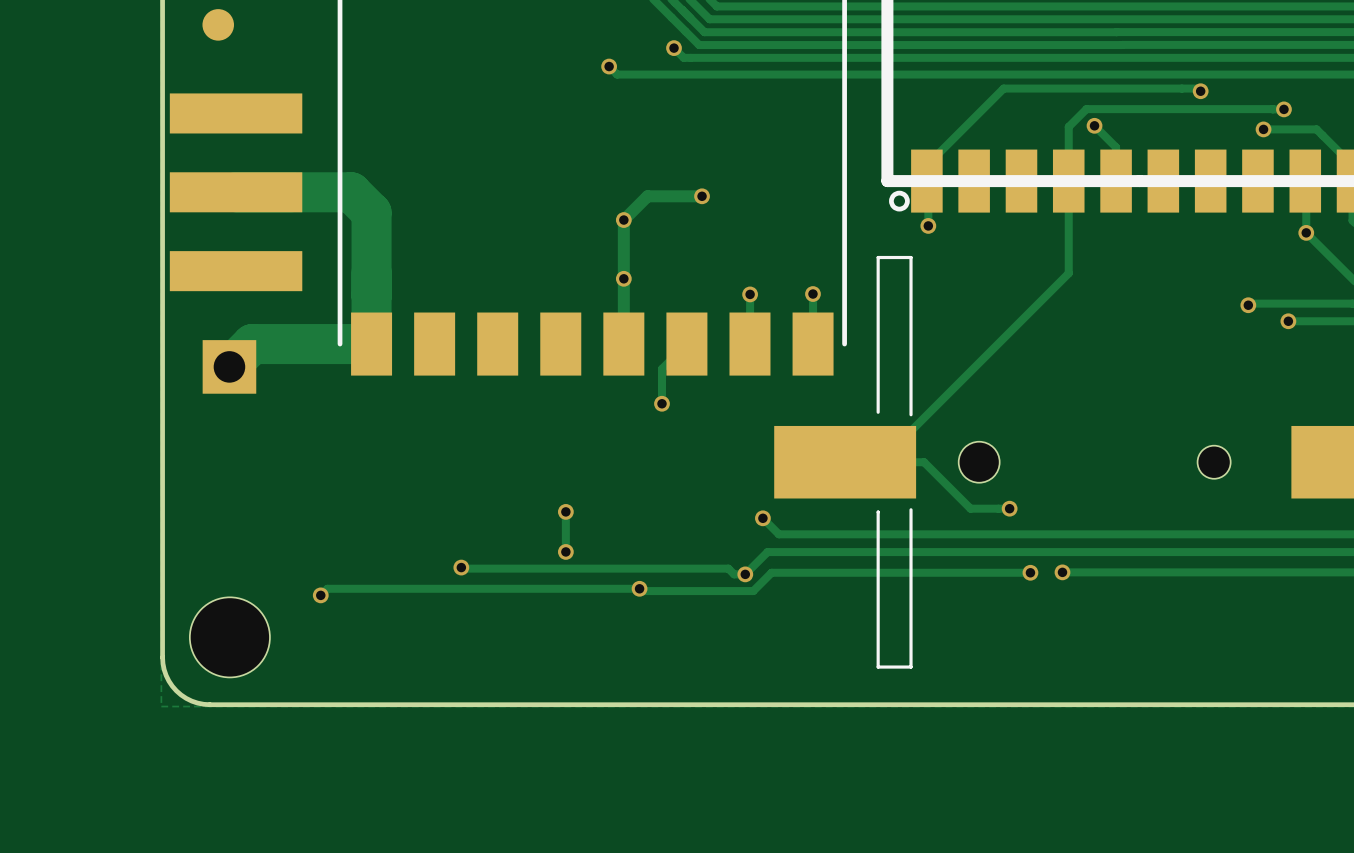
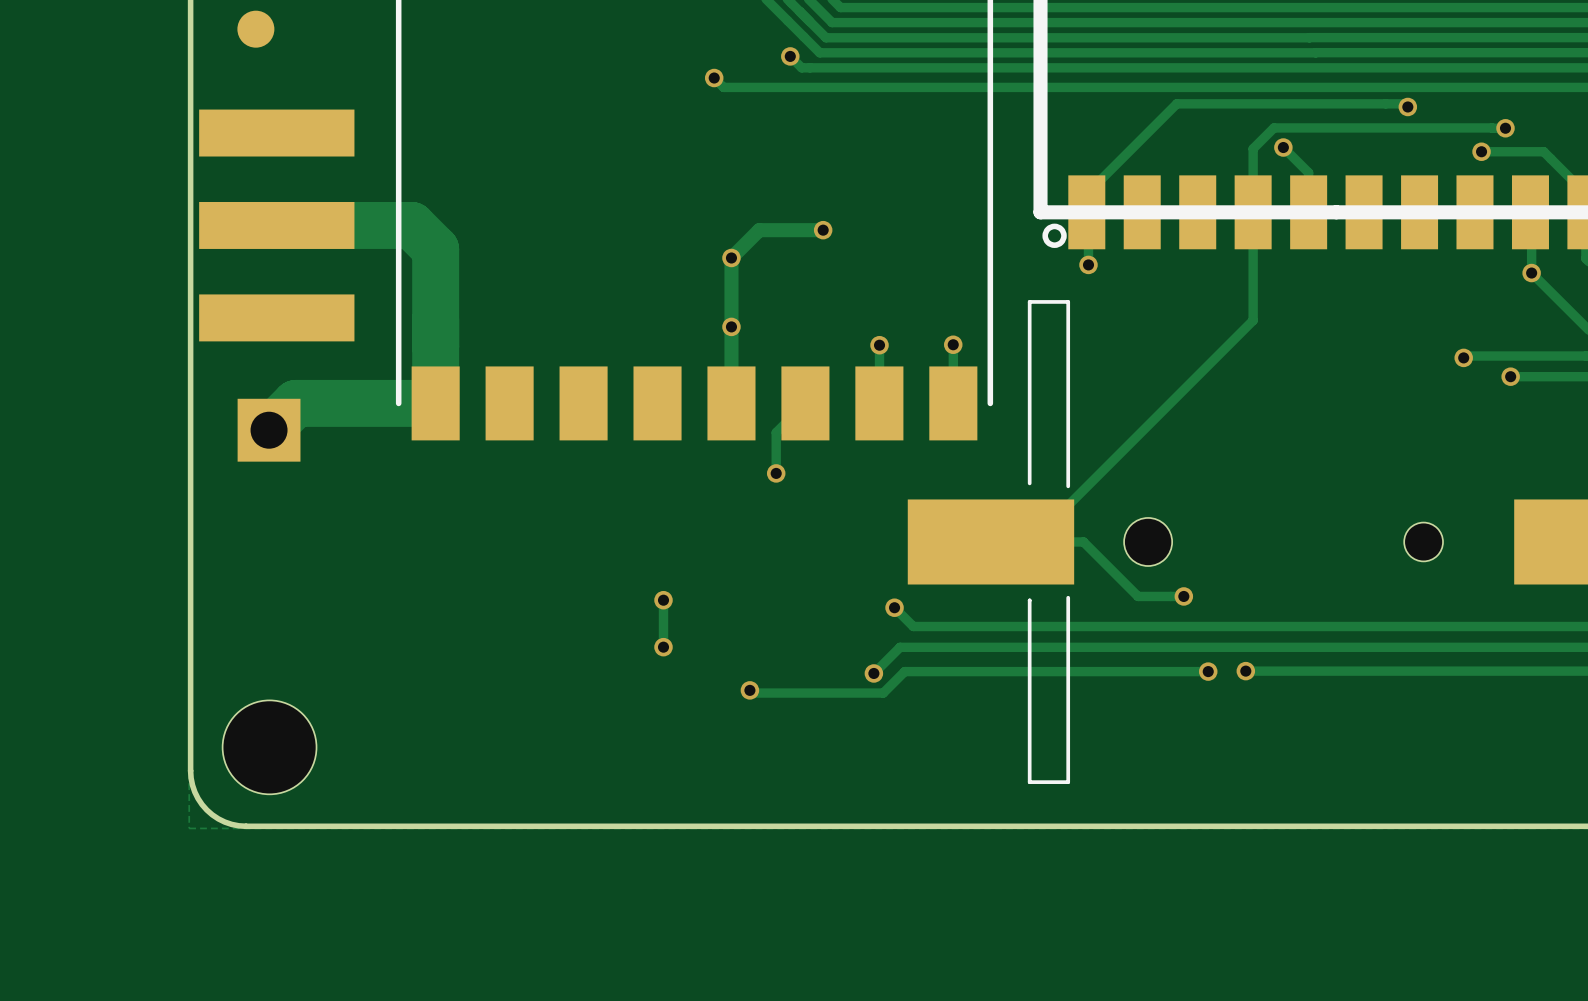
track: (461, 567) (728, 568) (734, 574) (745, 574) -> none
via: (461, 567) -> none
track: (639, 588) (327, 588) (320, 595) -> none
via: (320, 595) -> none

